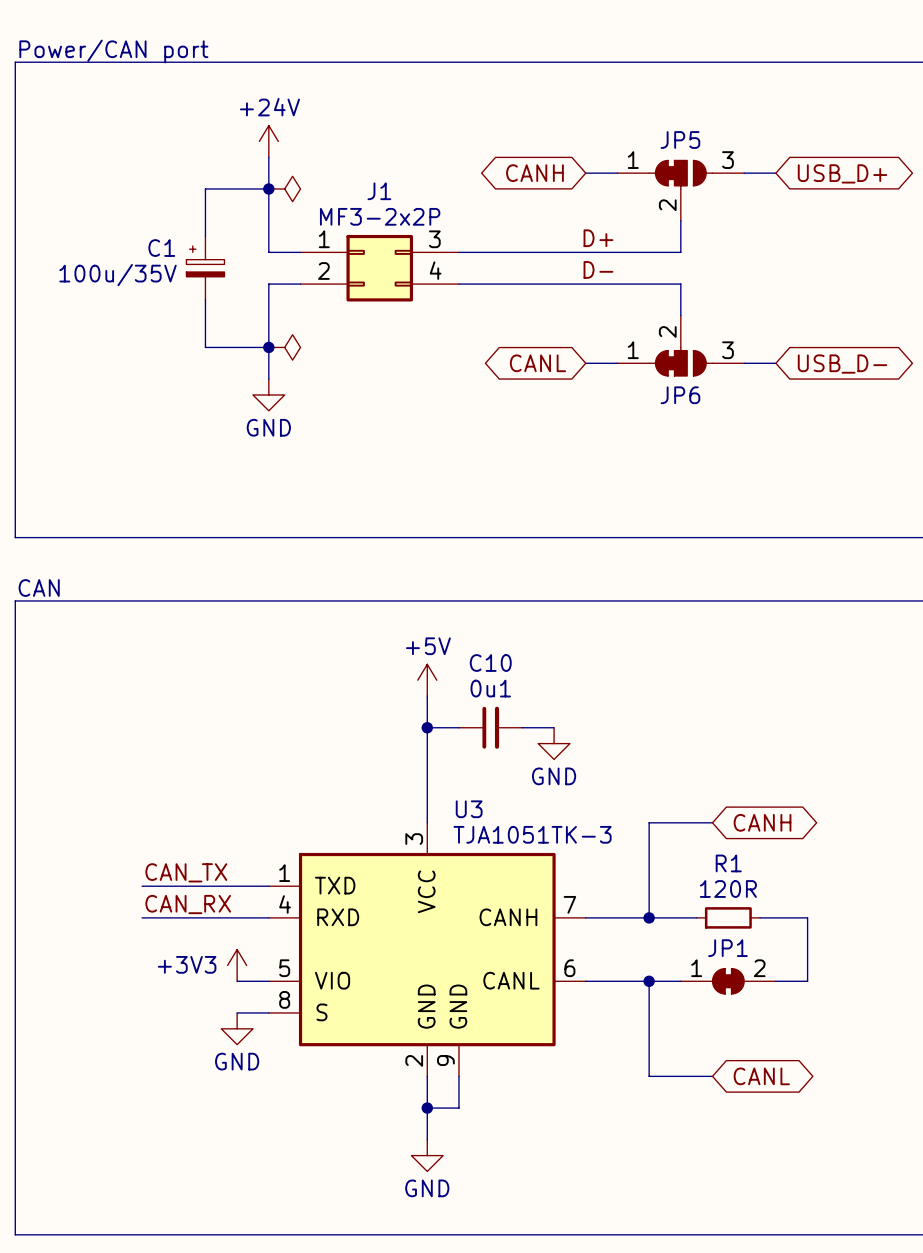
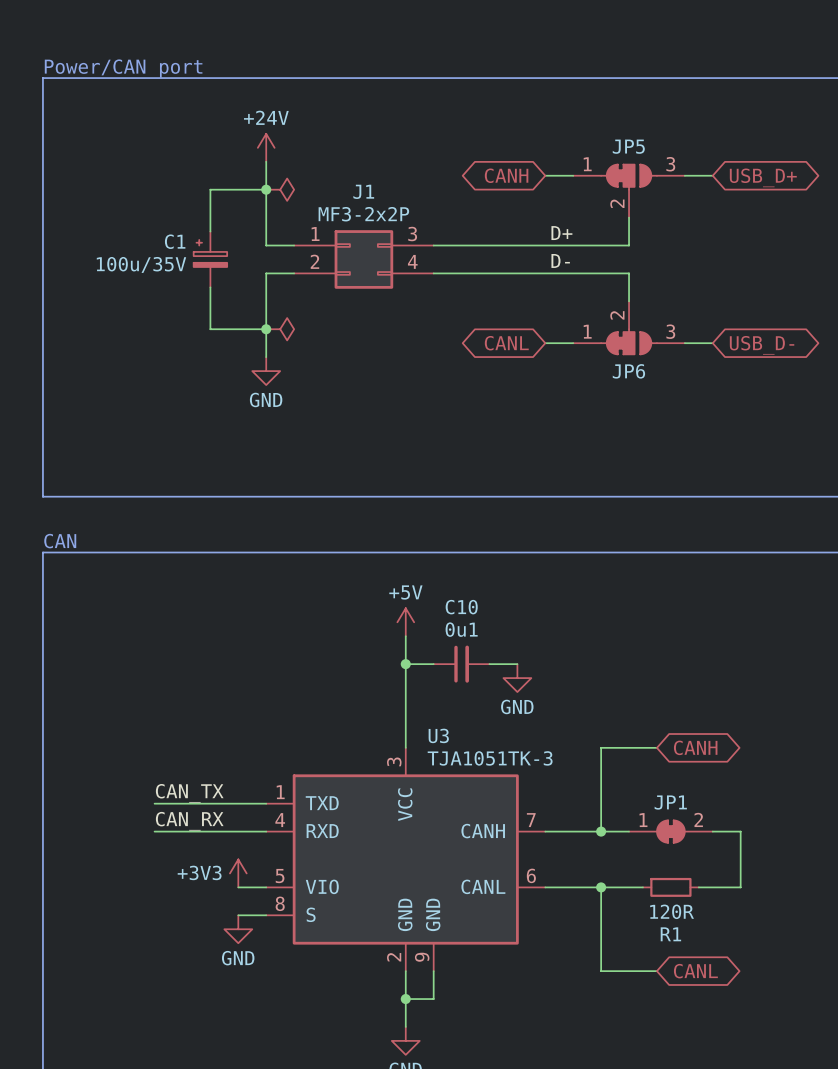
R1 name position: R1 (728, 863) -> R1 (670, 934)
R1 value position: 120R (728, 889) -> 120R (672, 911)
R1 position: (728, 917) -> (670, 887)
JP1 position: (728, 981) -> (670, 831)

